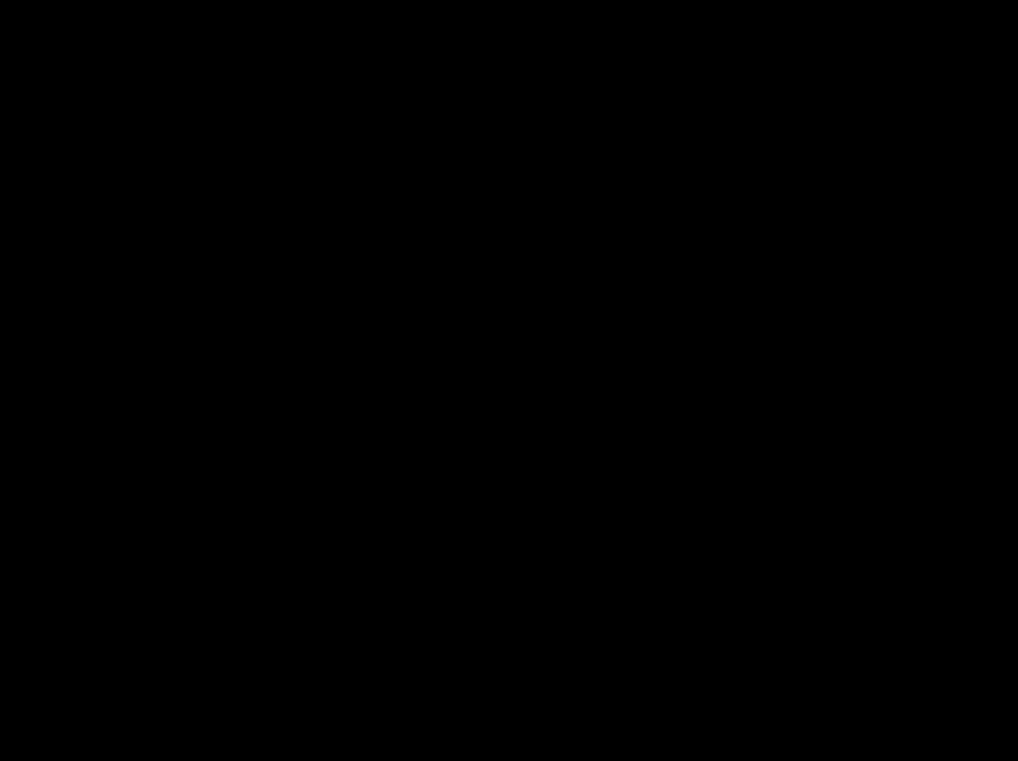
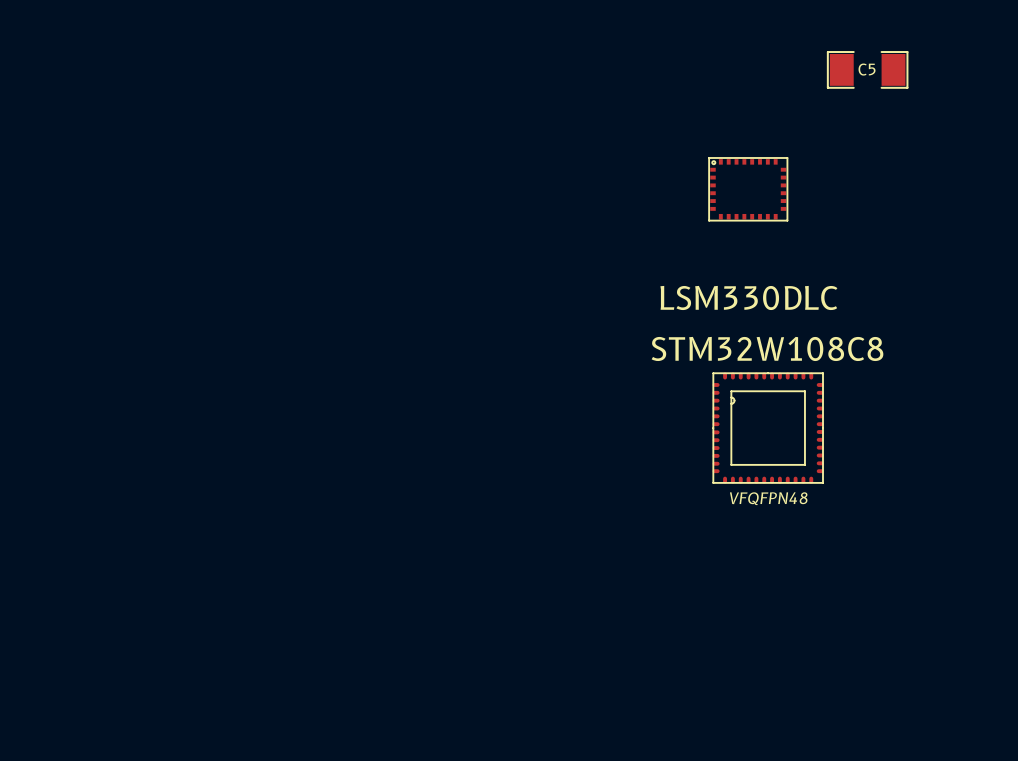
C5: none -> (867, 69)
LSM330DLC: none -> (748, 189)
STM32W108C8: none -> VFQFPN48 (768, 428)

